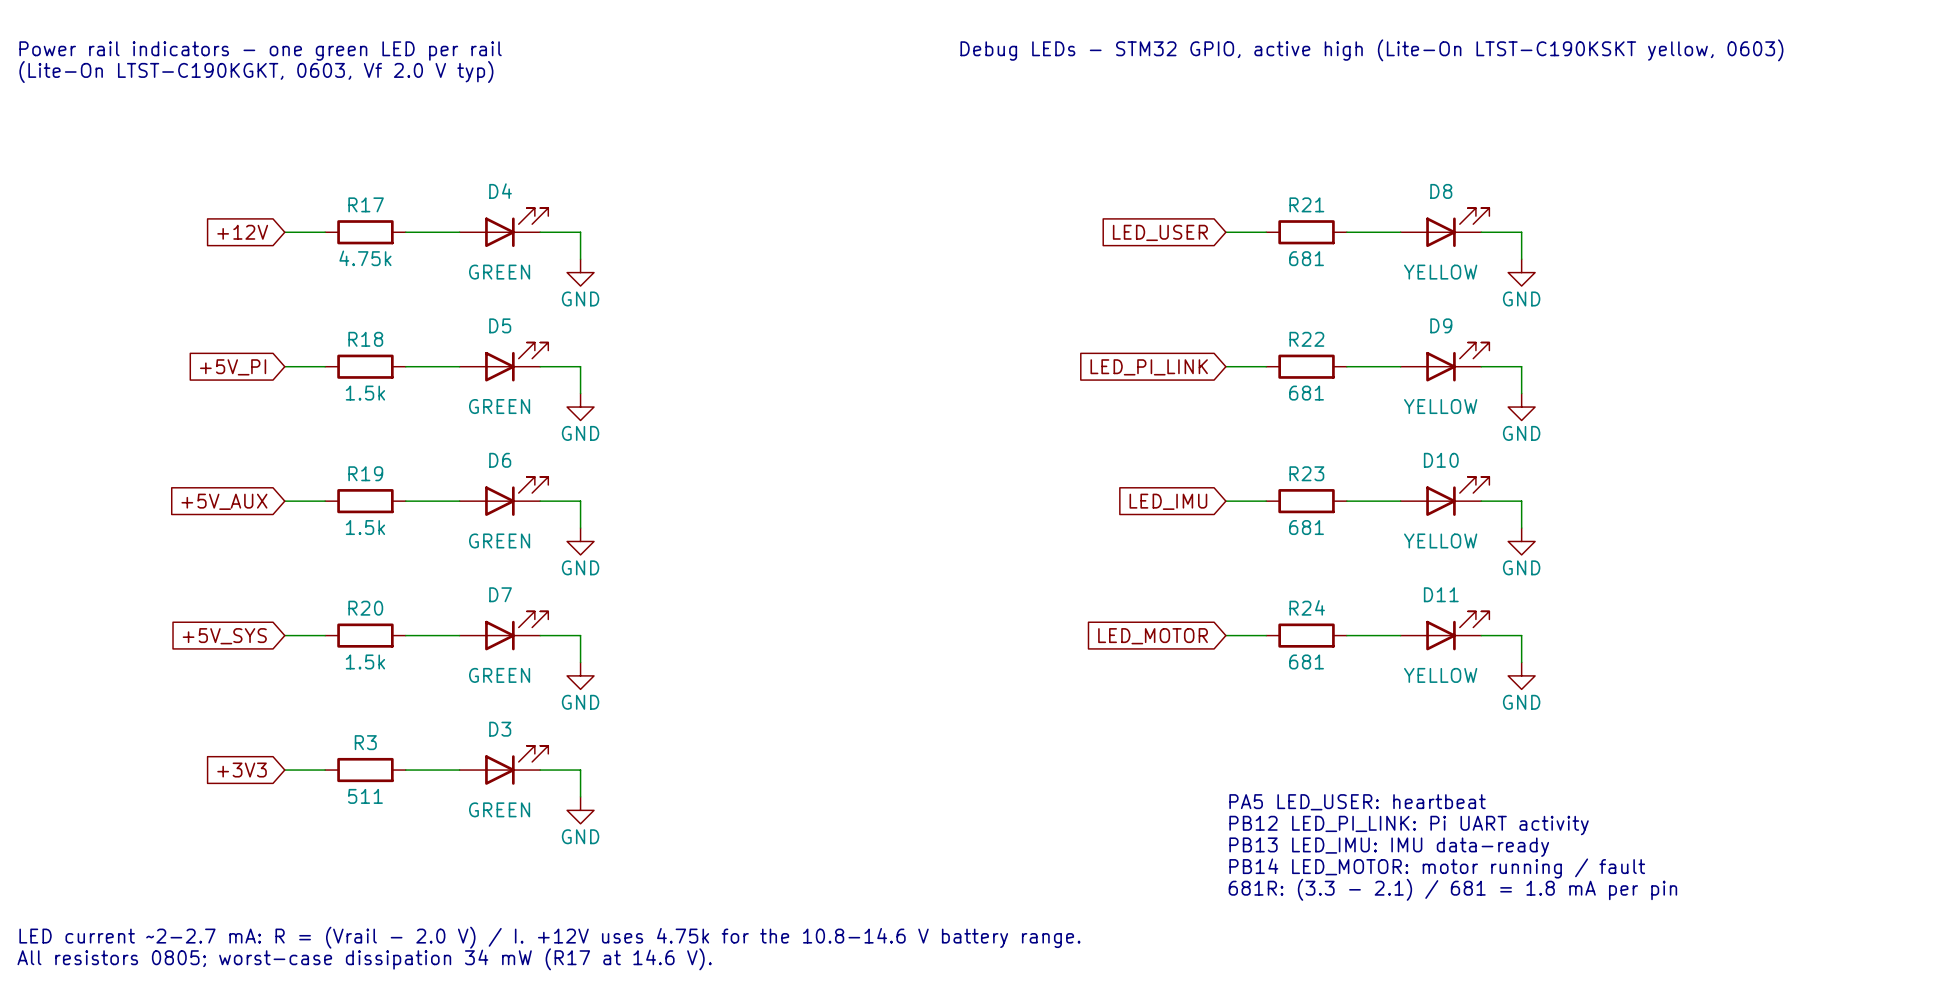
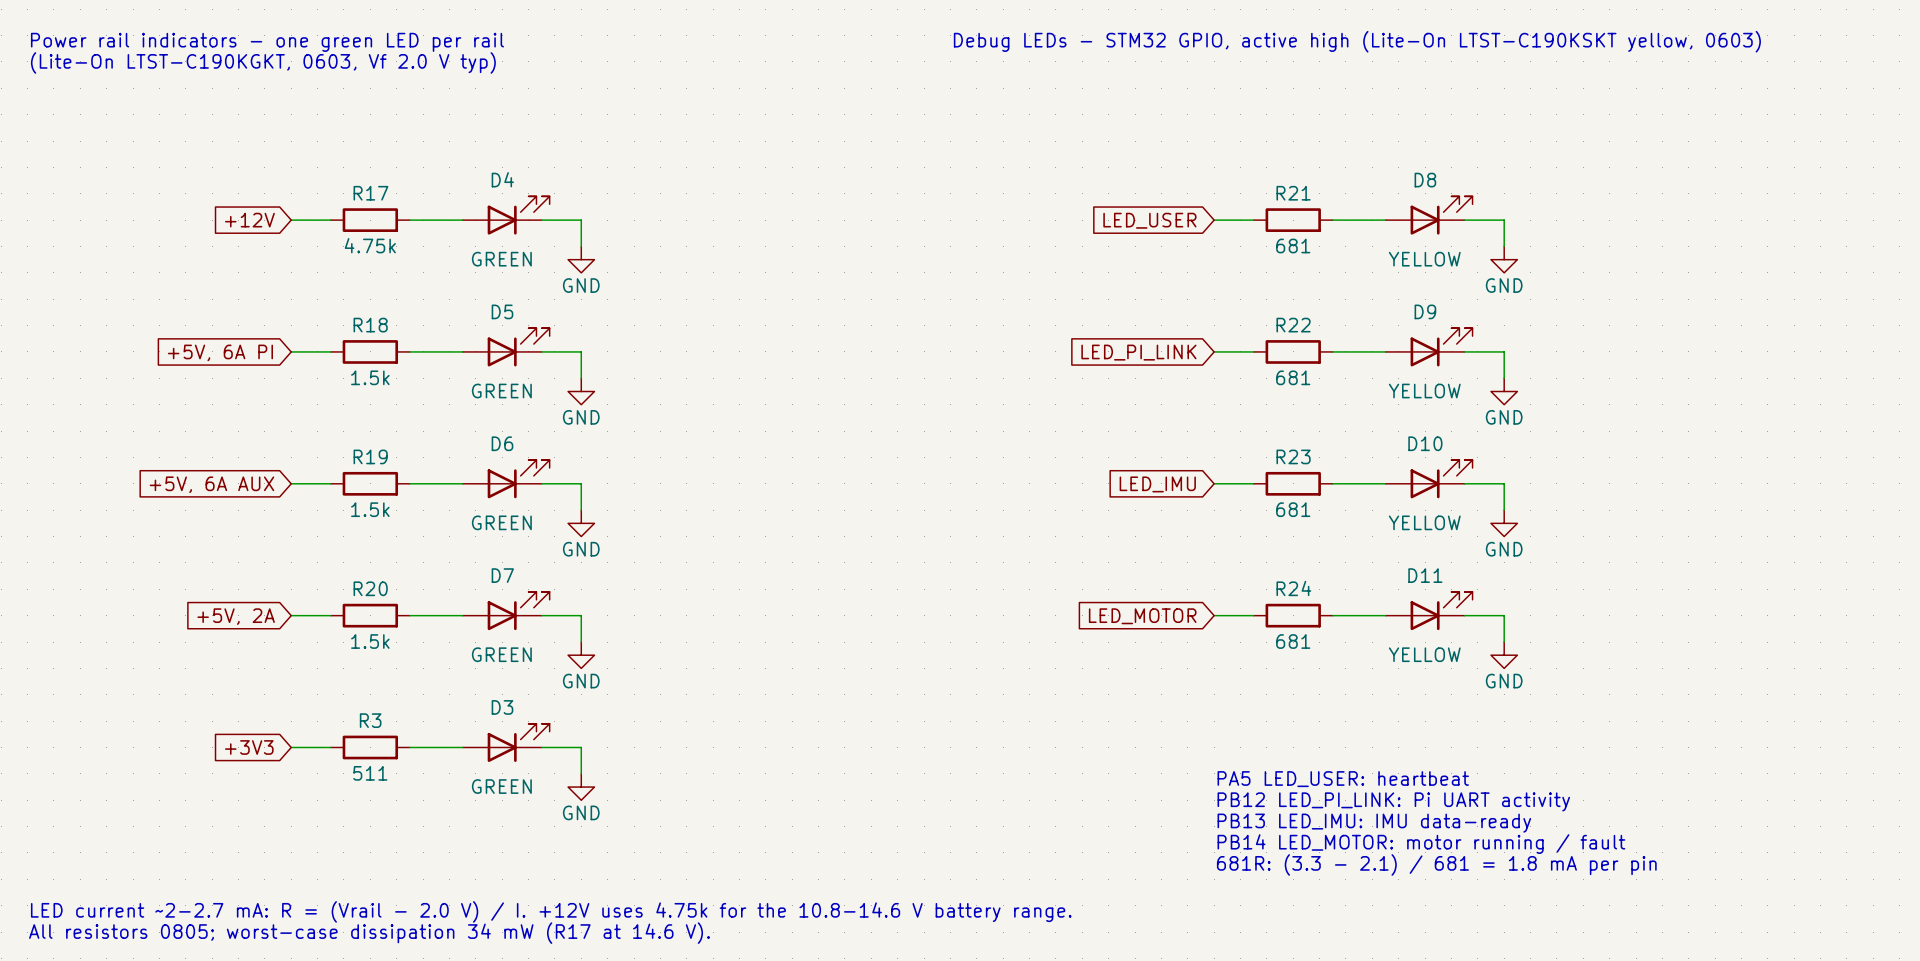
global label: +5V_PI (233, 367) -> +5V, 6A PI (220, 352)
global label: +5V_AUX (224, 501) -> +5V, 6A AUX (211, 484)
global label: +5V_SYS (224, 636) -> +5V, 2A (236, 616)

